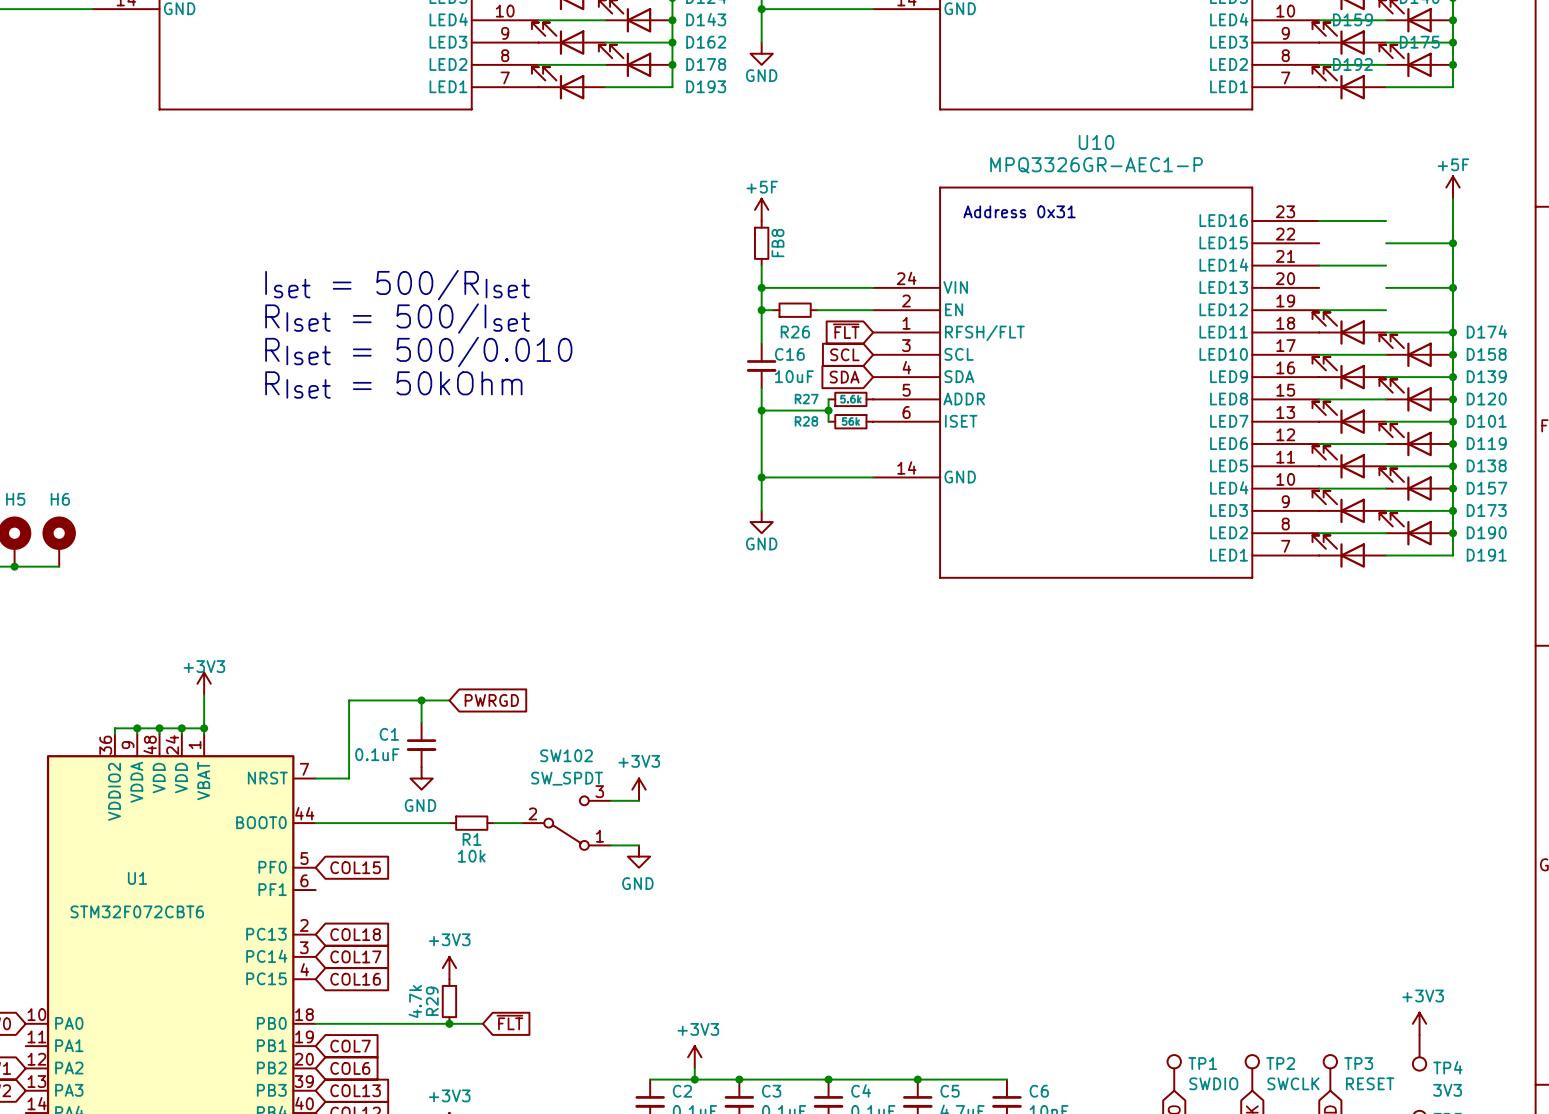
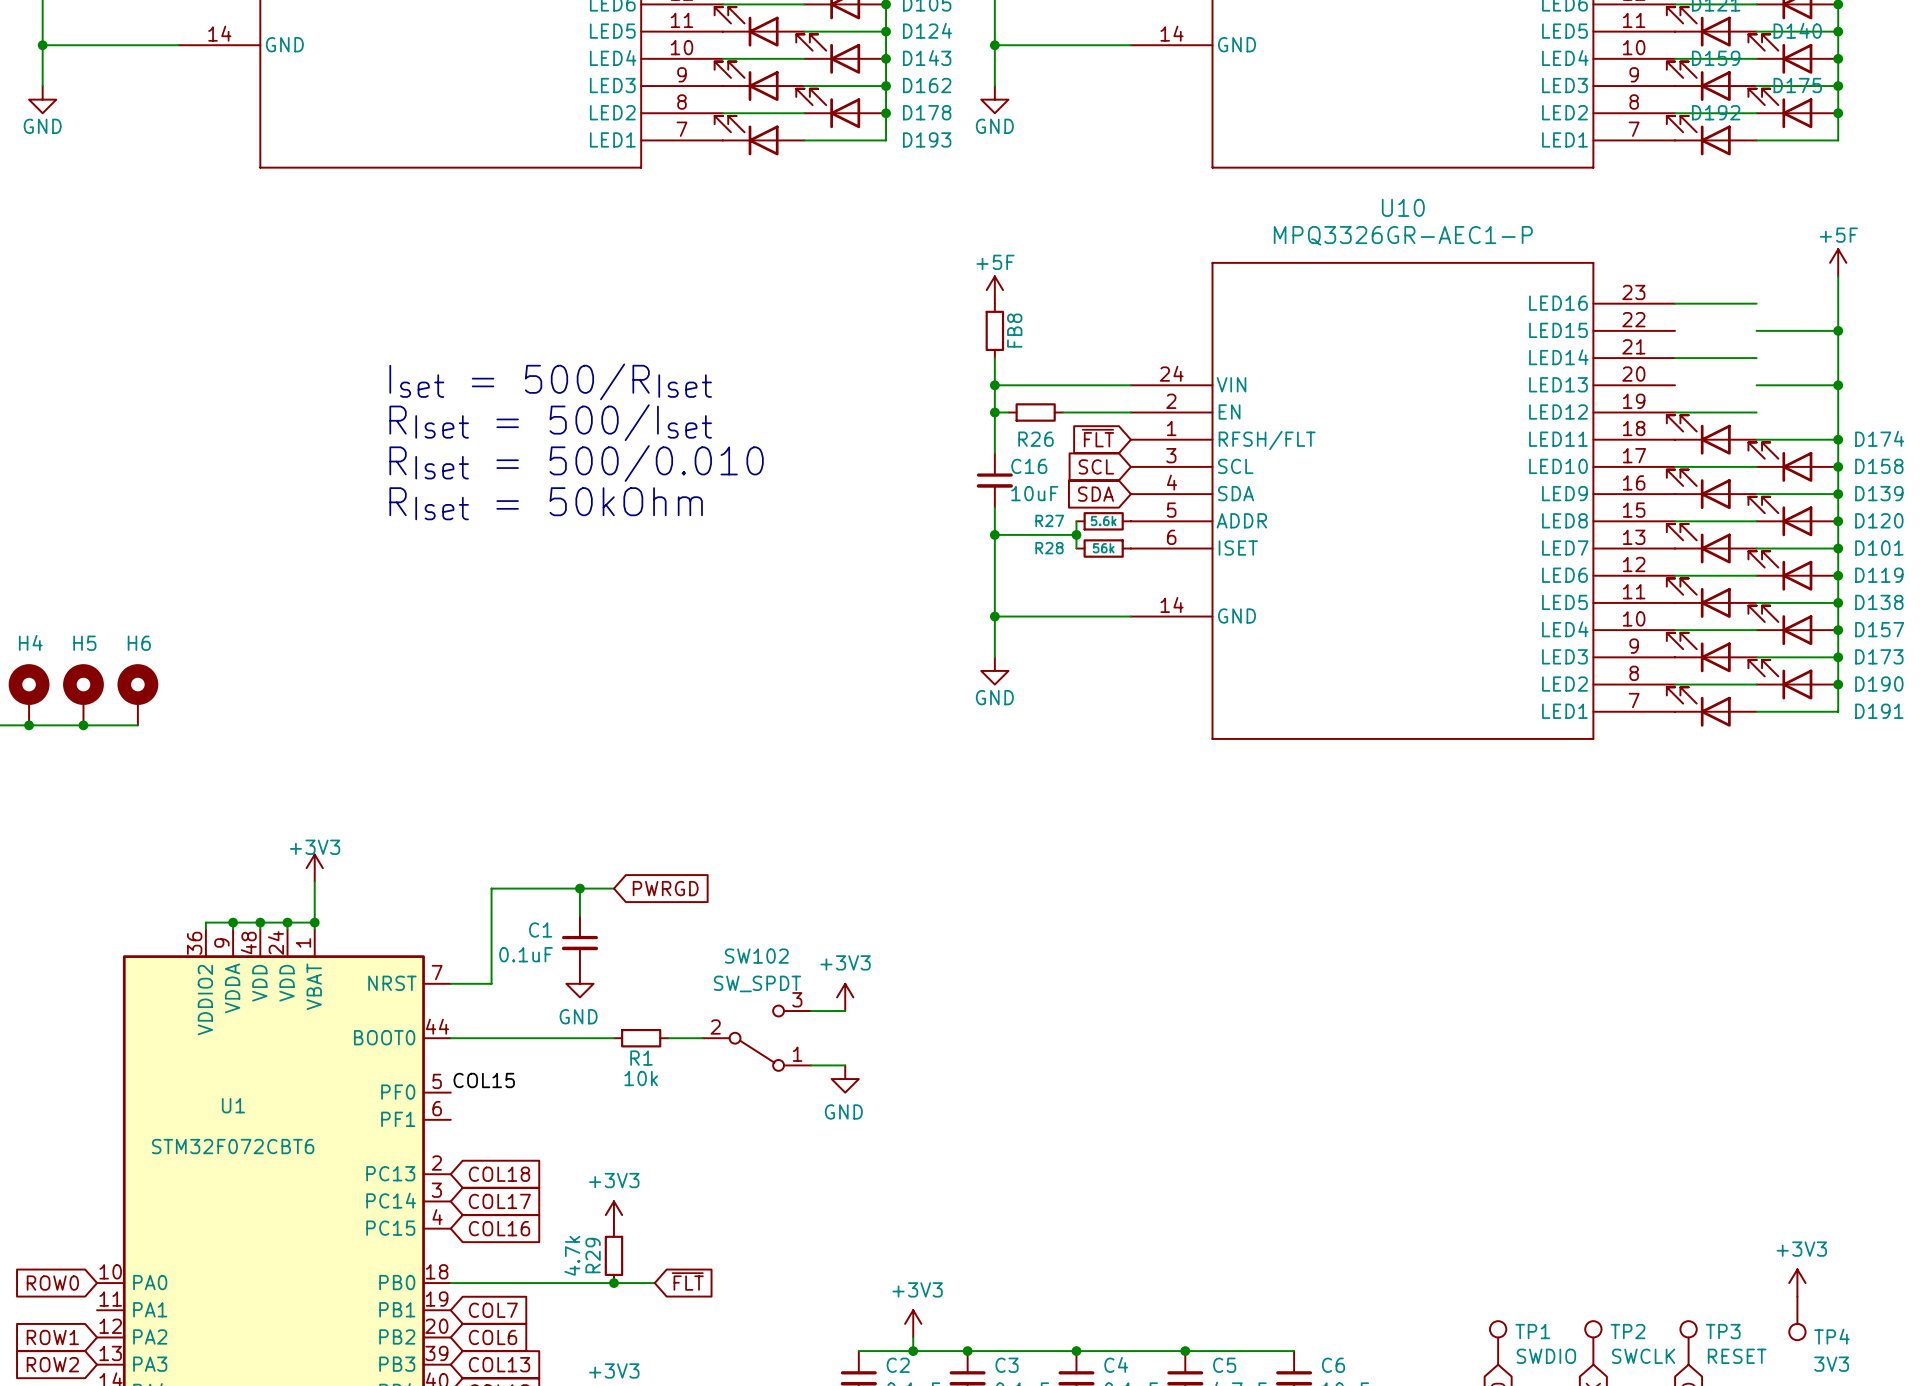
text: Address 0x31 (1019, 211) -> none
label: none -> COL15 (484, 1080)
global label: COL15 (355, 867) -> none

